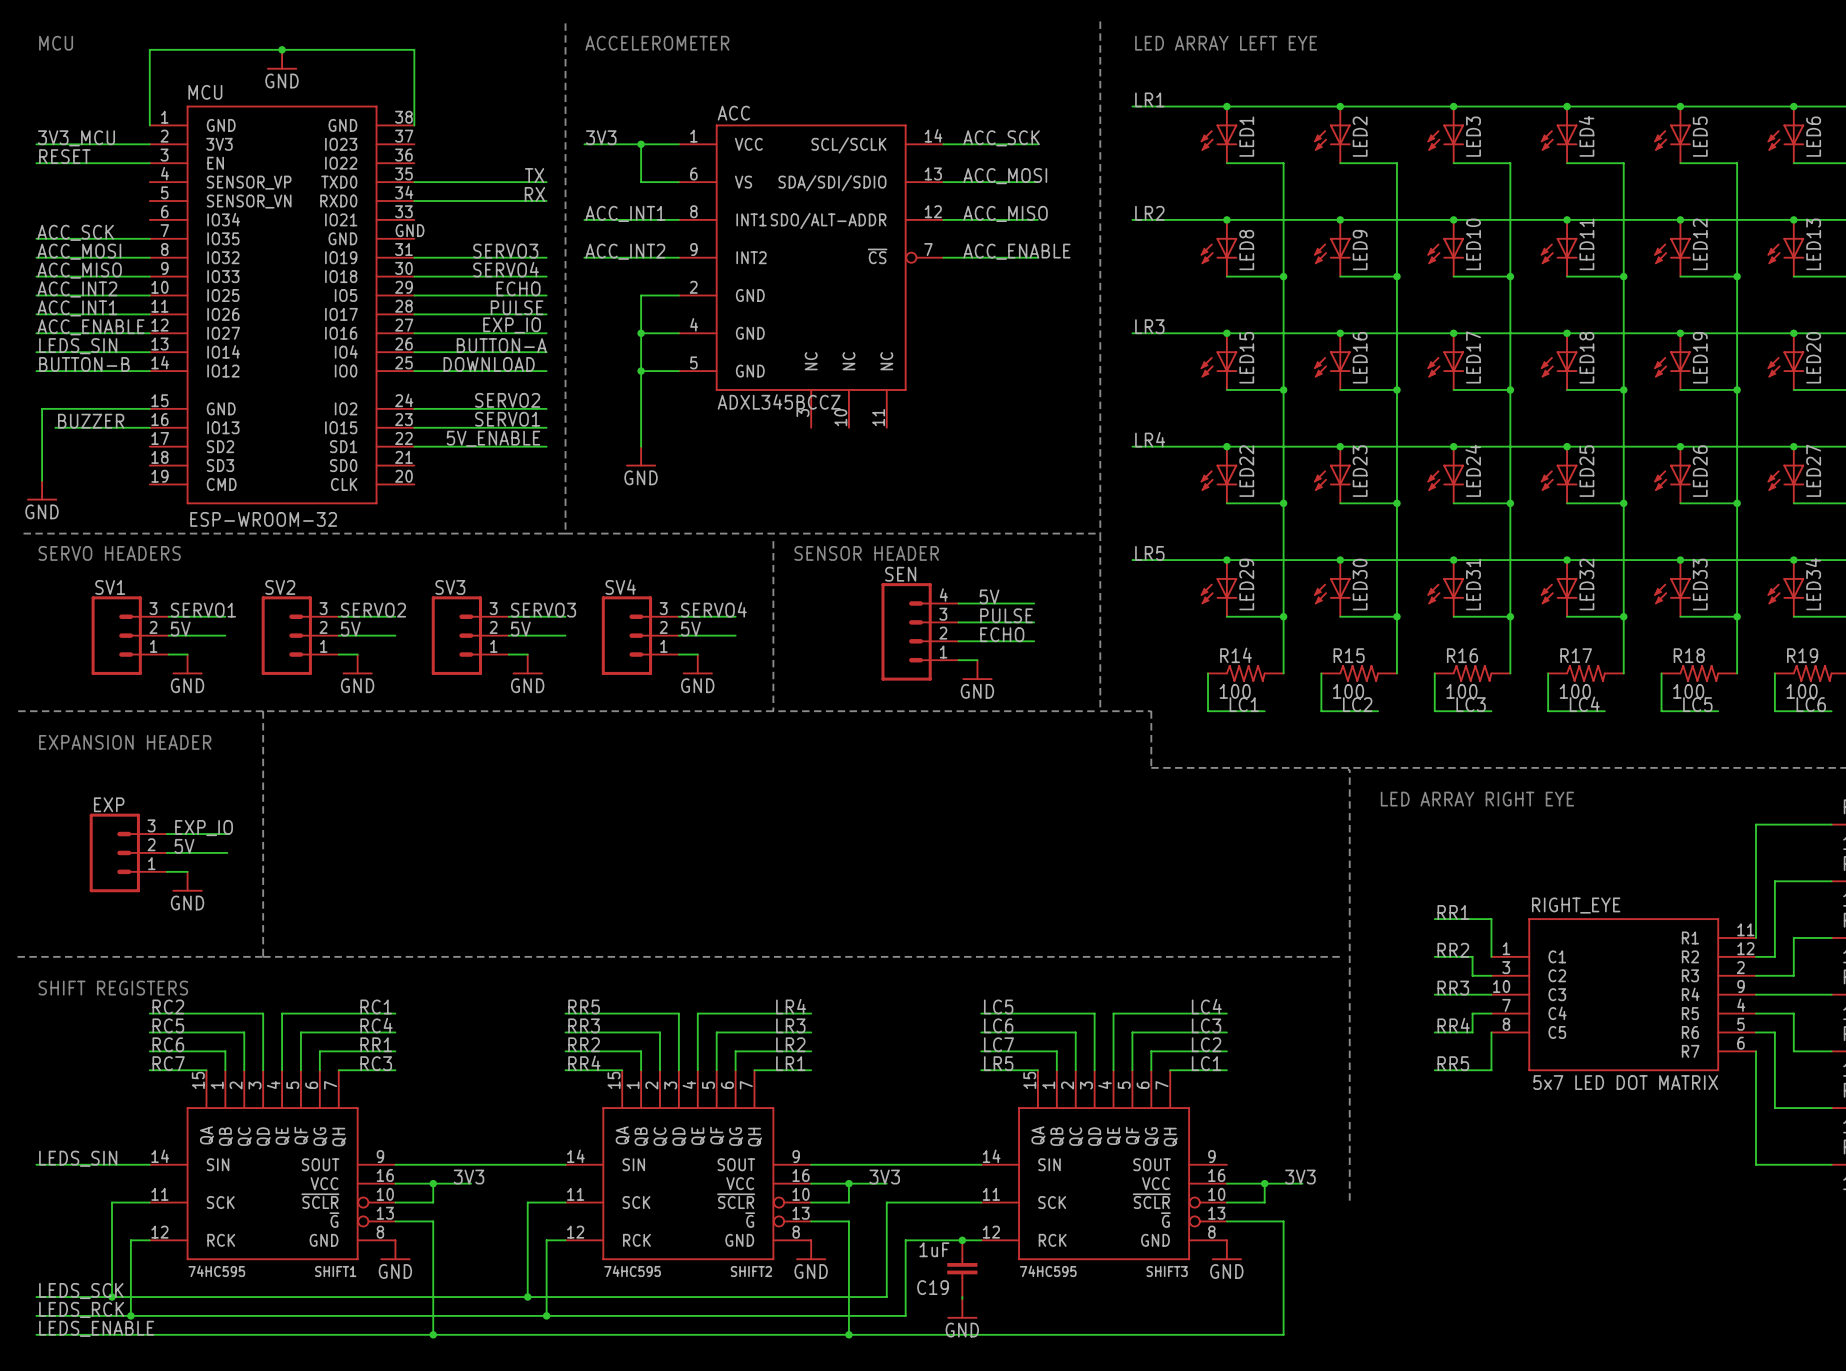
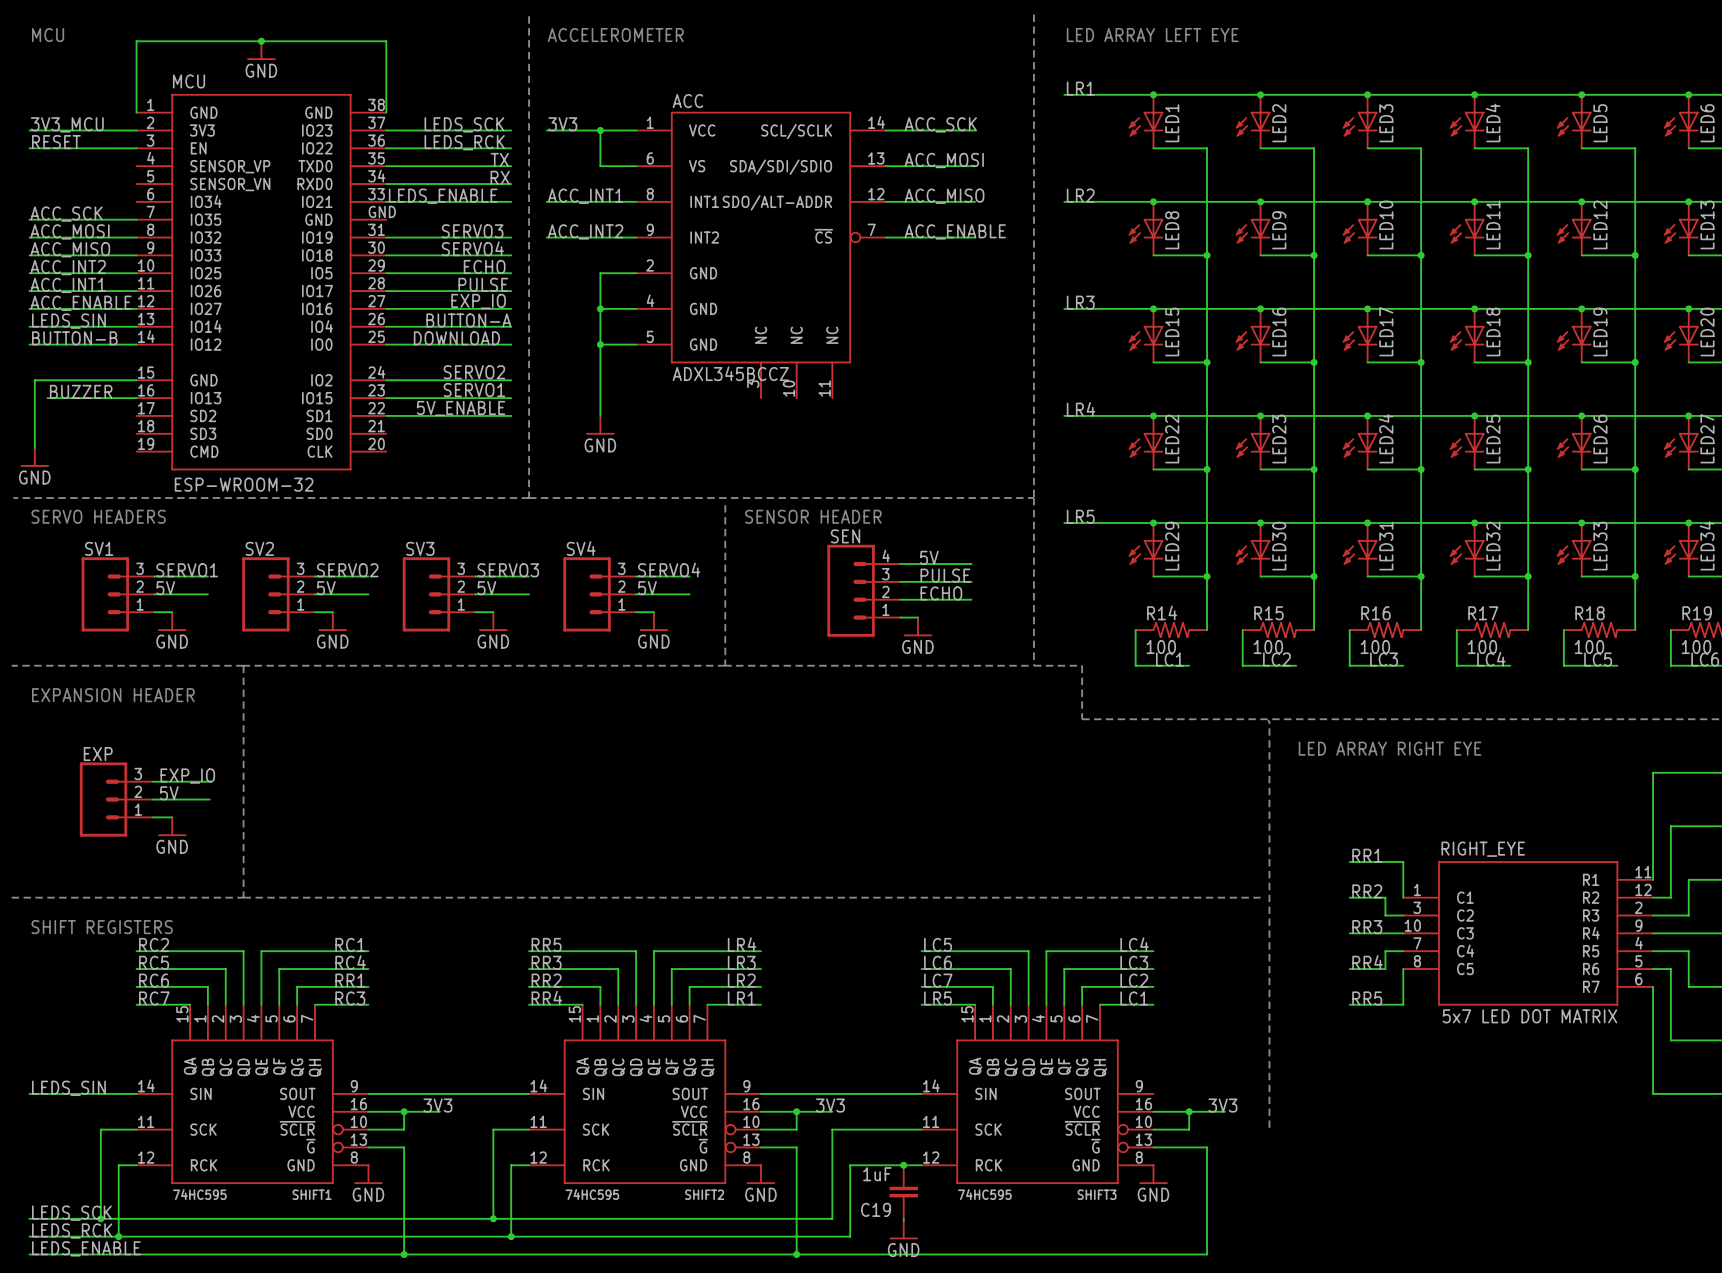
label: none -> LEDS_SCK (464, 124)
wire: none -> (386, 130) (511, 130)
label: none -> LEDS_RCK (464, 142)
wire: none -> (386, 148) (511, 148)
label: none -> LEDS_ENABLE (443, 196)
wire: none -> (386, 201) (511, 201)

